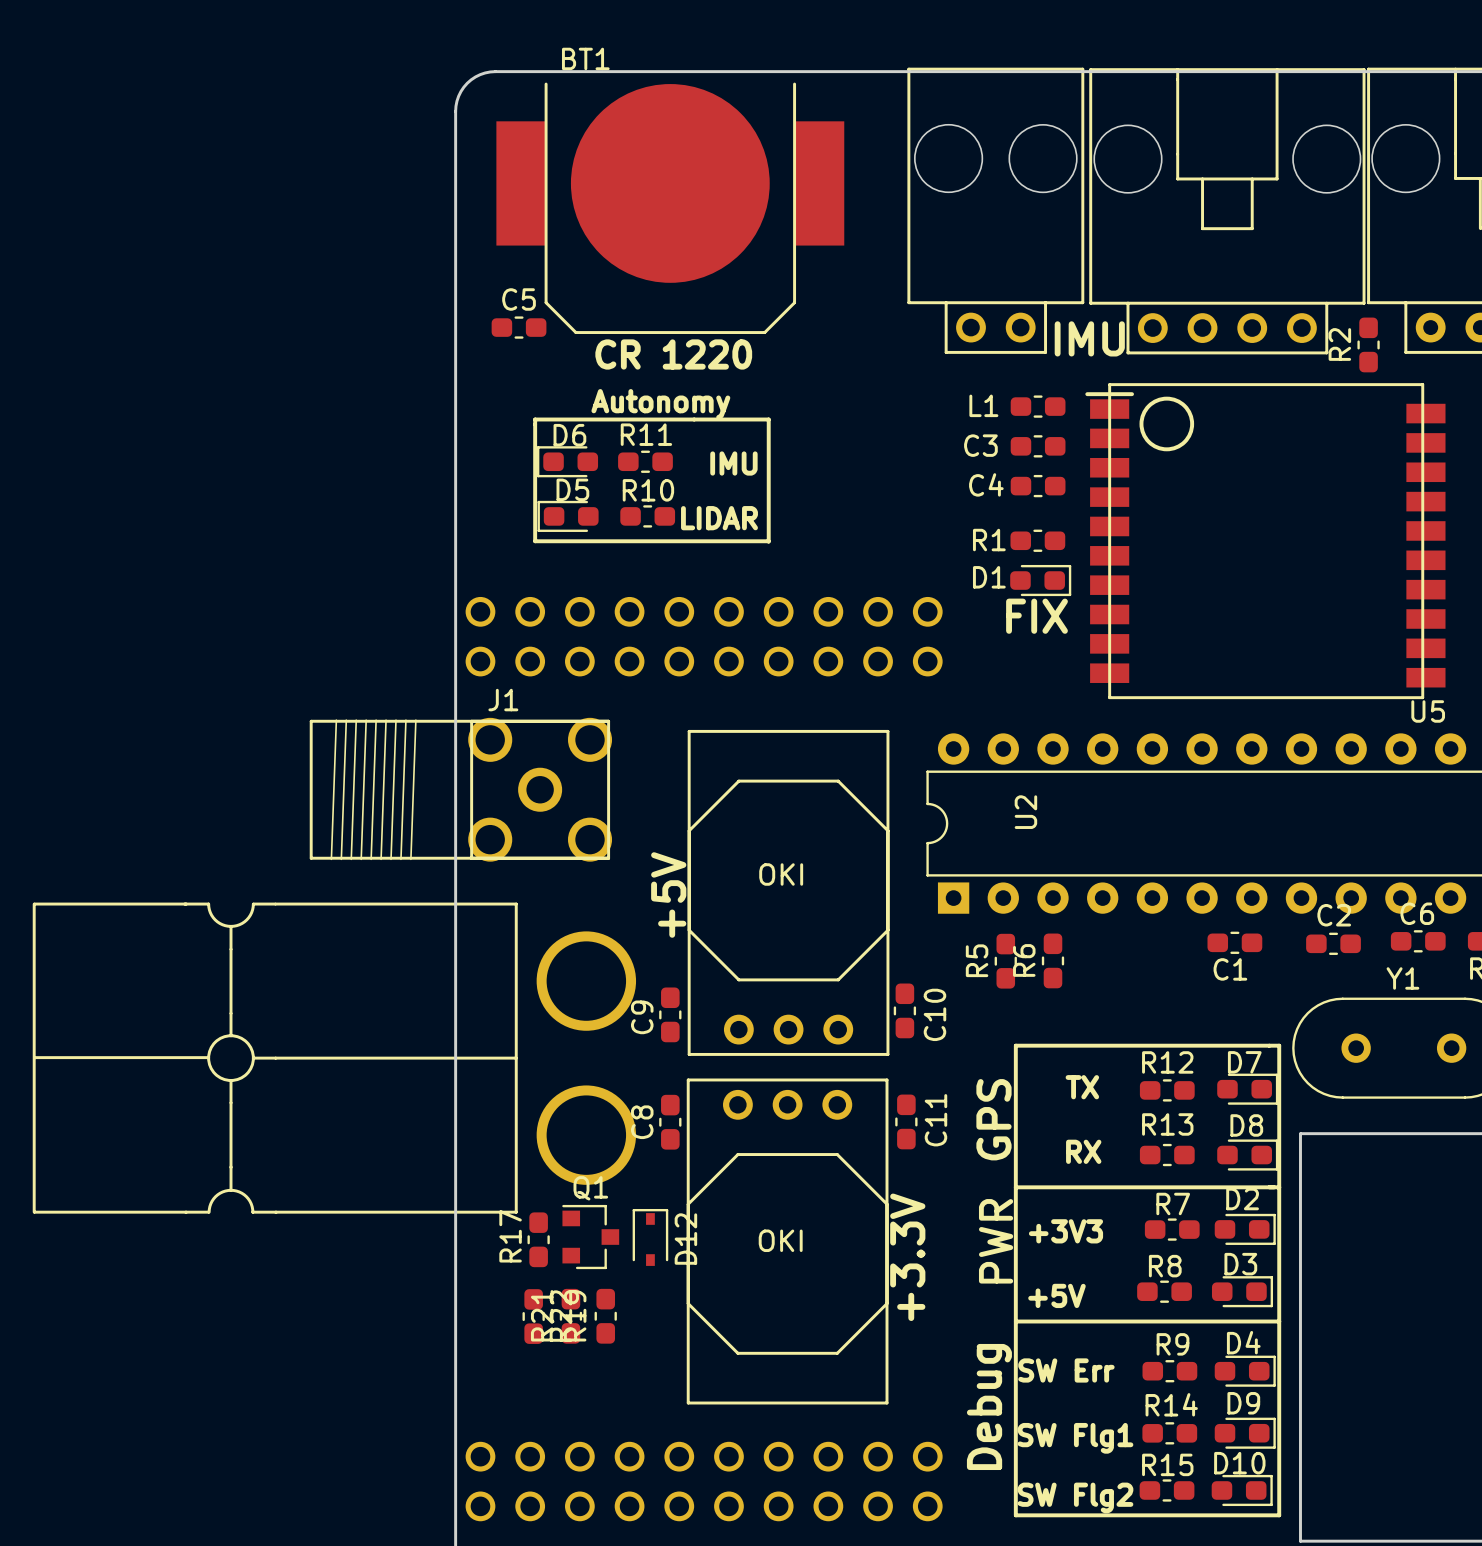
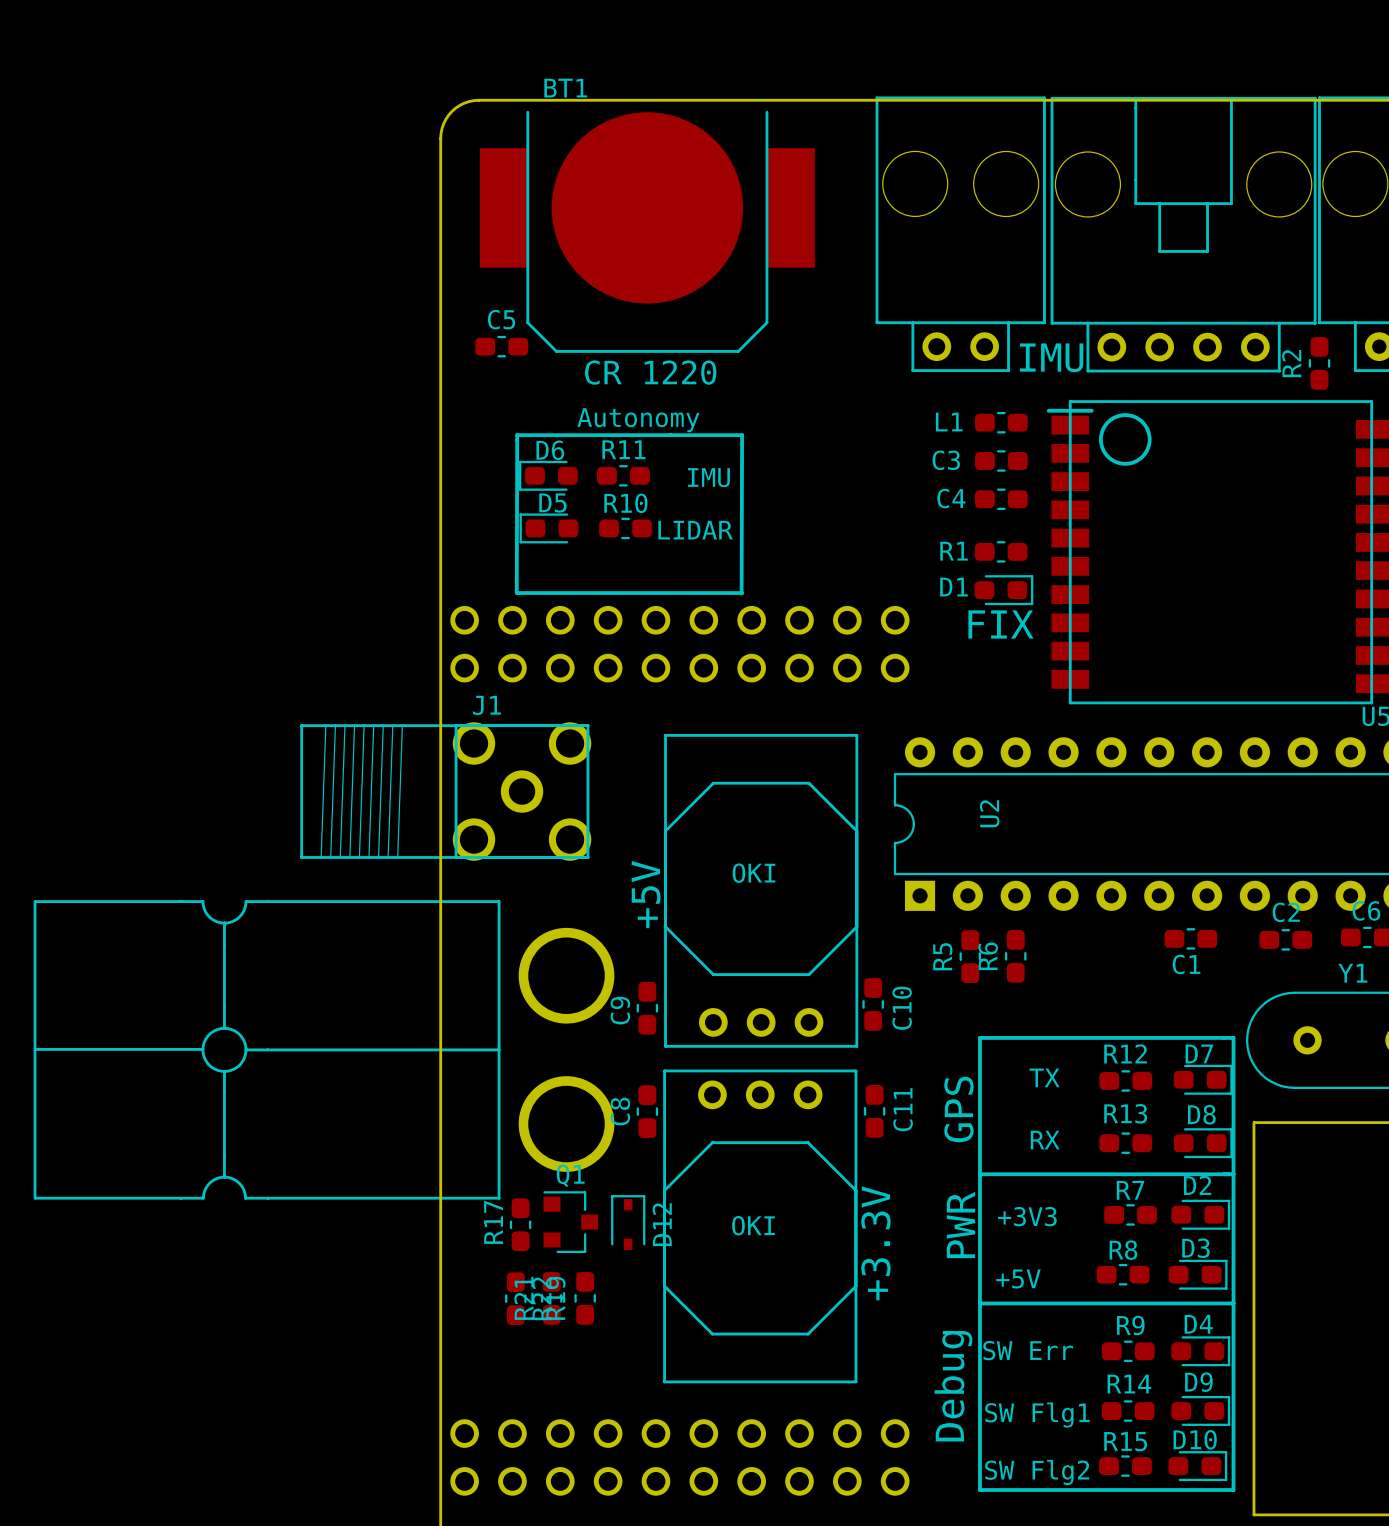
line: (768, 419) (768, 541) -> (742, 435) (741, 593)
line: (535, 424) (535, 541) (768, 541) -> (517, 439) (516, 593)
line: none -> (517, 593) (742, 593)

